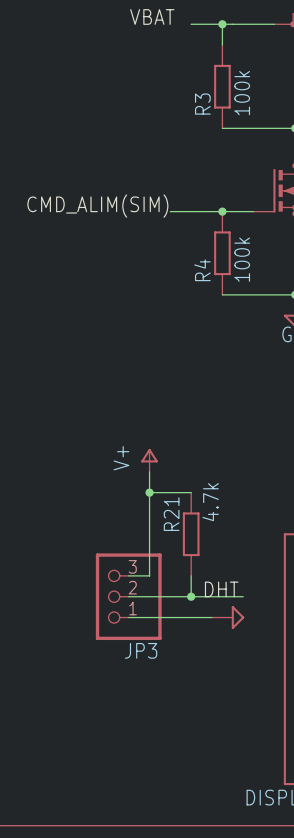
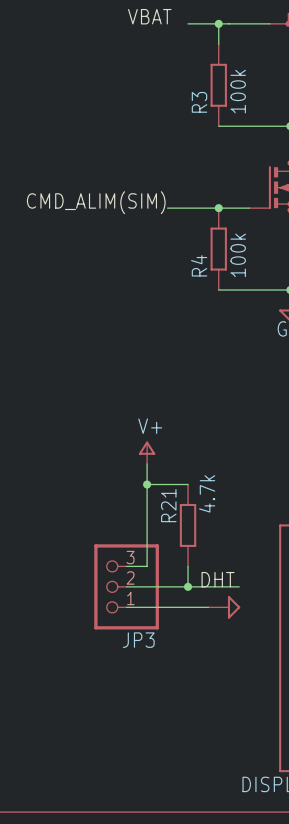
power symbol text rotation: 0° (121, 458) -> 90° clockwise (150, 426)
power symbol text position: V+ (121, 458) -> V+ (150, 426)

